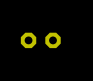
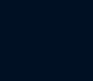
part: (40, 40) -> none

